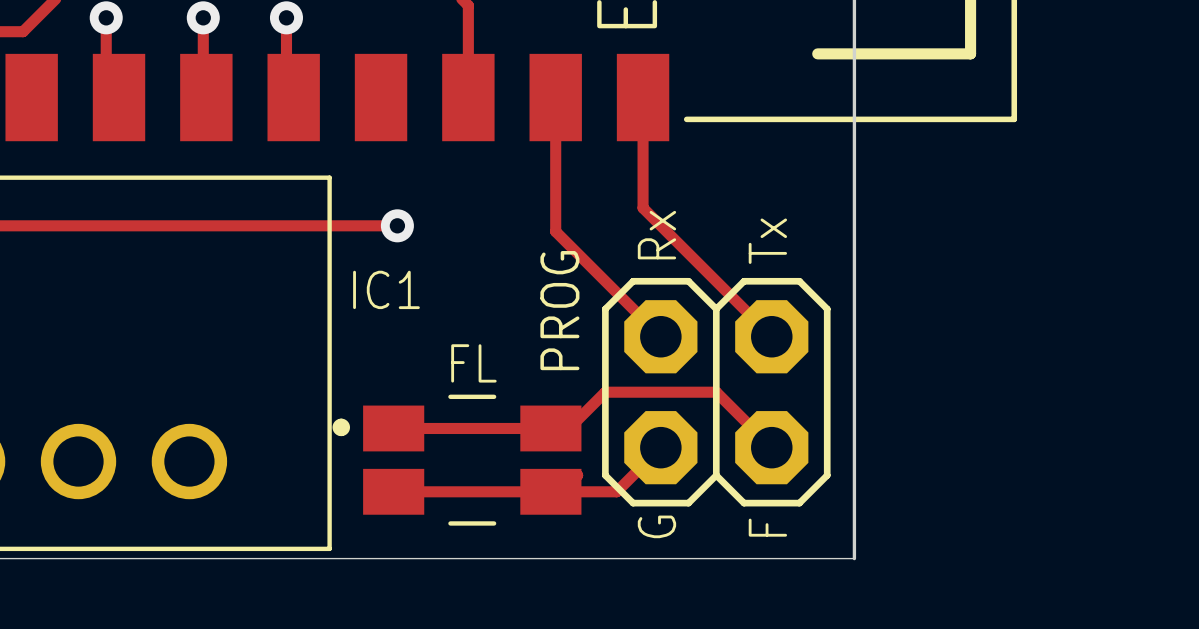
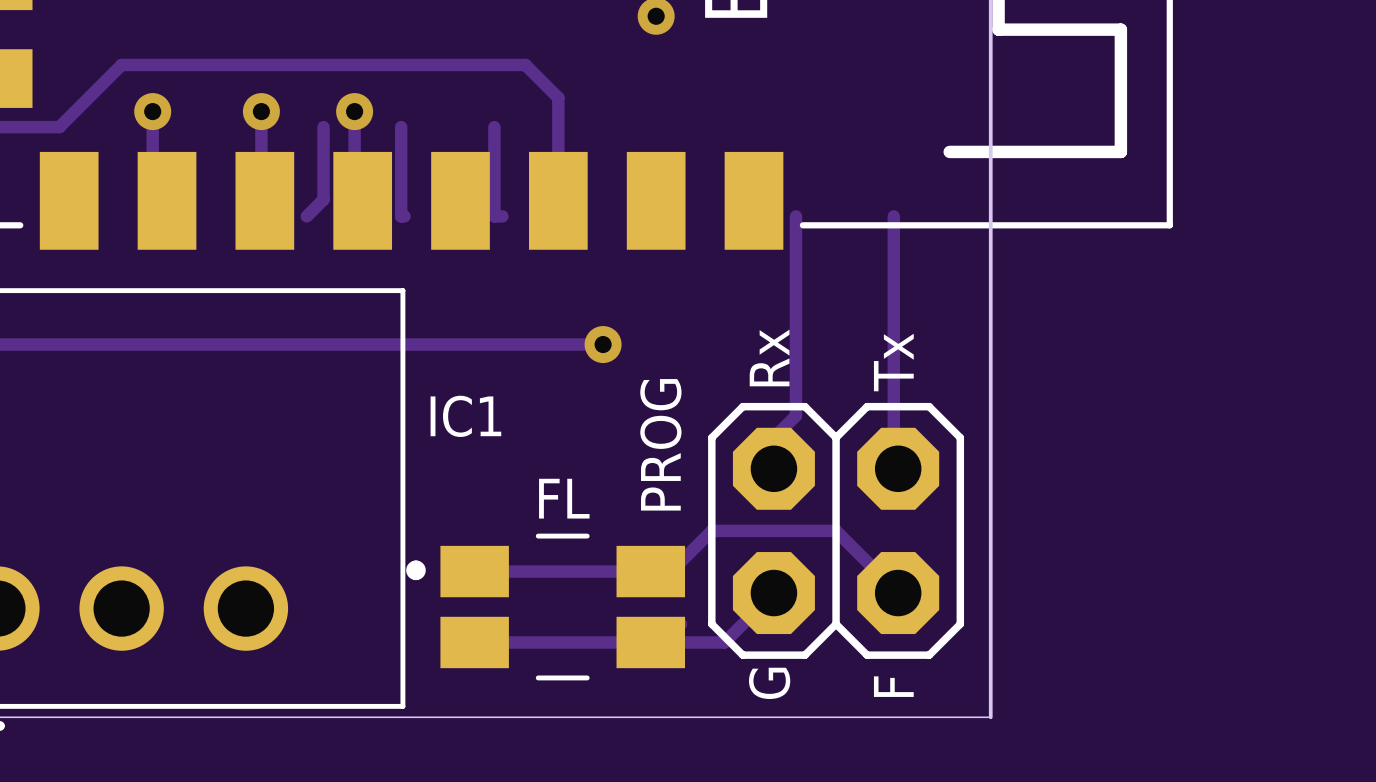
track: none -> (323, 127) (323, 199) (306, 216)
track: none -> (401, 127) (401, 216) (404, 216)
track: none -> (494, 127) (494, 216) (502, 216)
track: (555, 97) (555, 231) (660, 336) -> (795, 216) (795, 415) (773, 437) (773, 468)
track: (643, 97) (643, 208) (767, 332) -> (893, 216) (893, 464)
track: none -> (478, 344) (603, 344)
via position: (397, 225) -> (603, 344)

